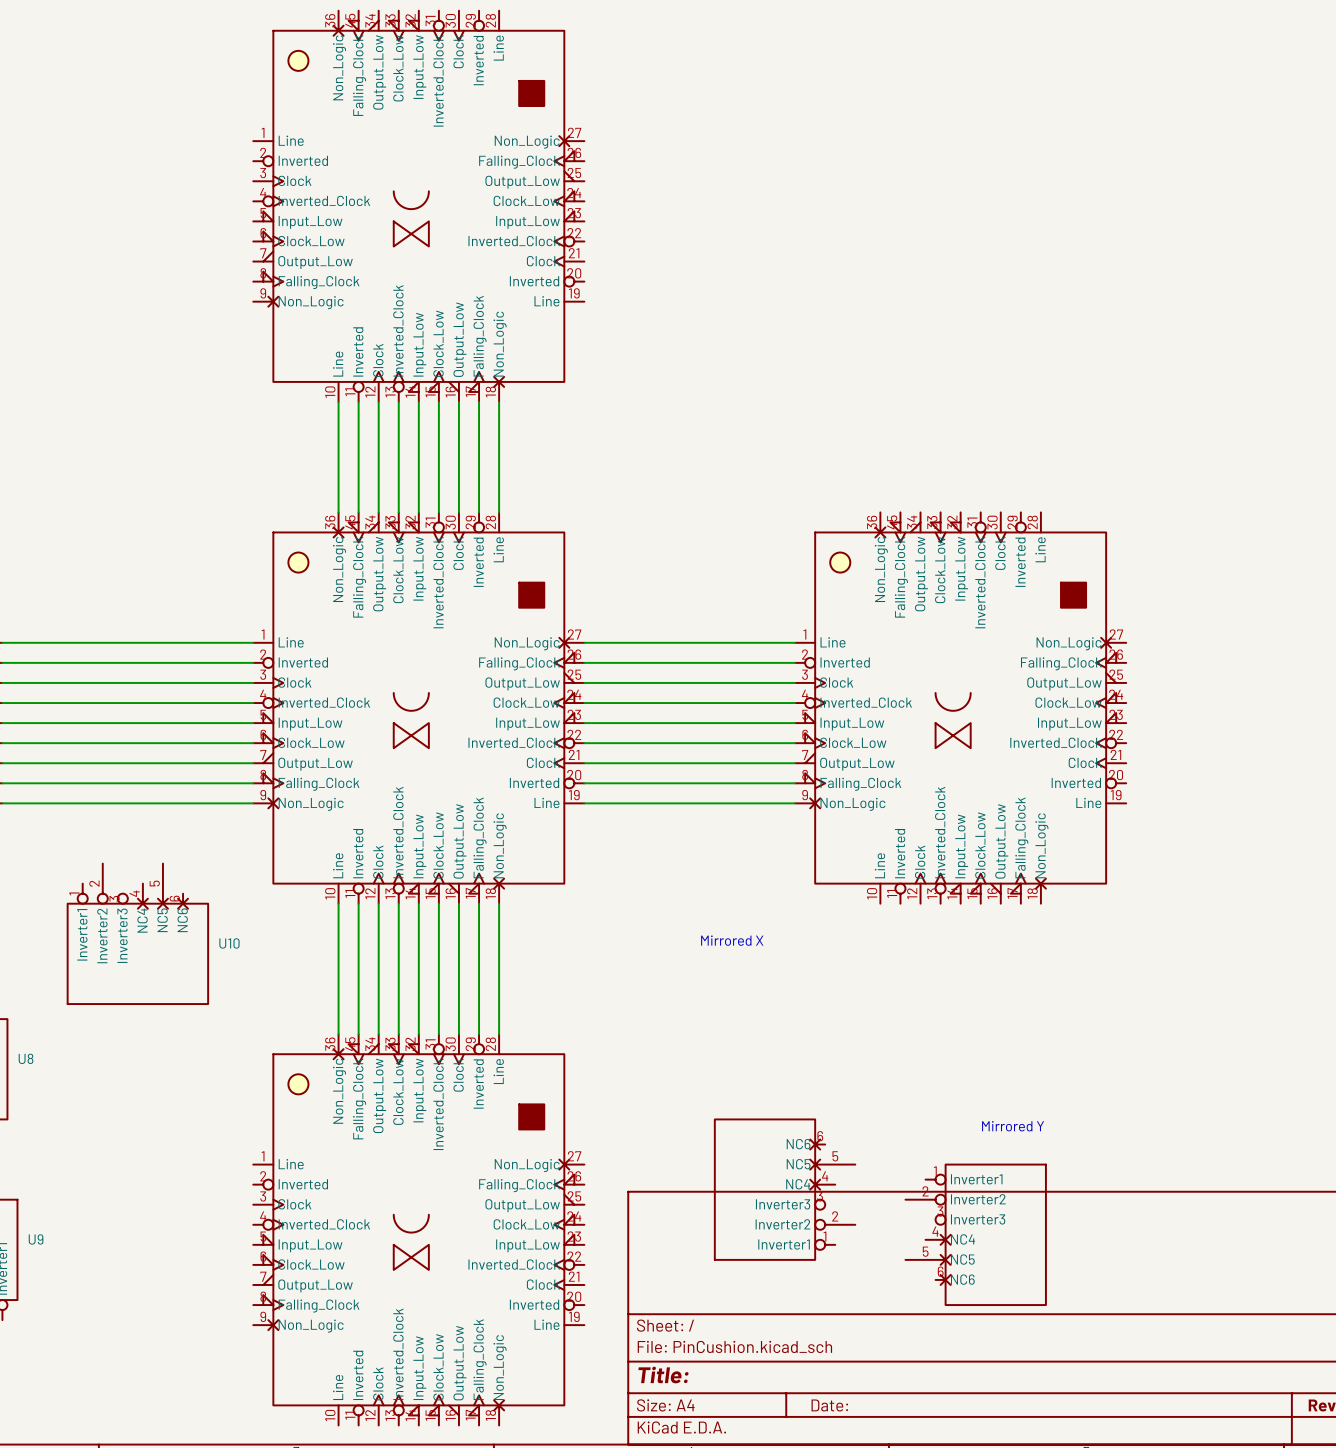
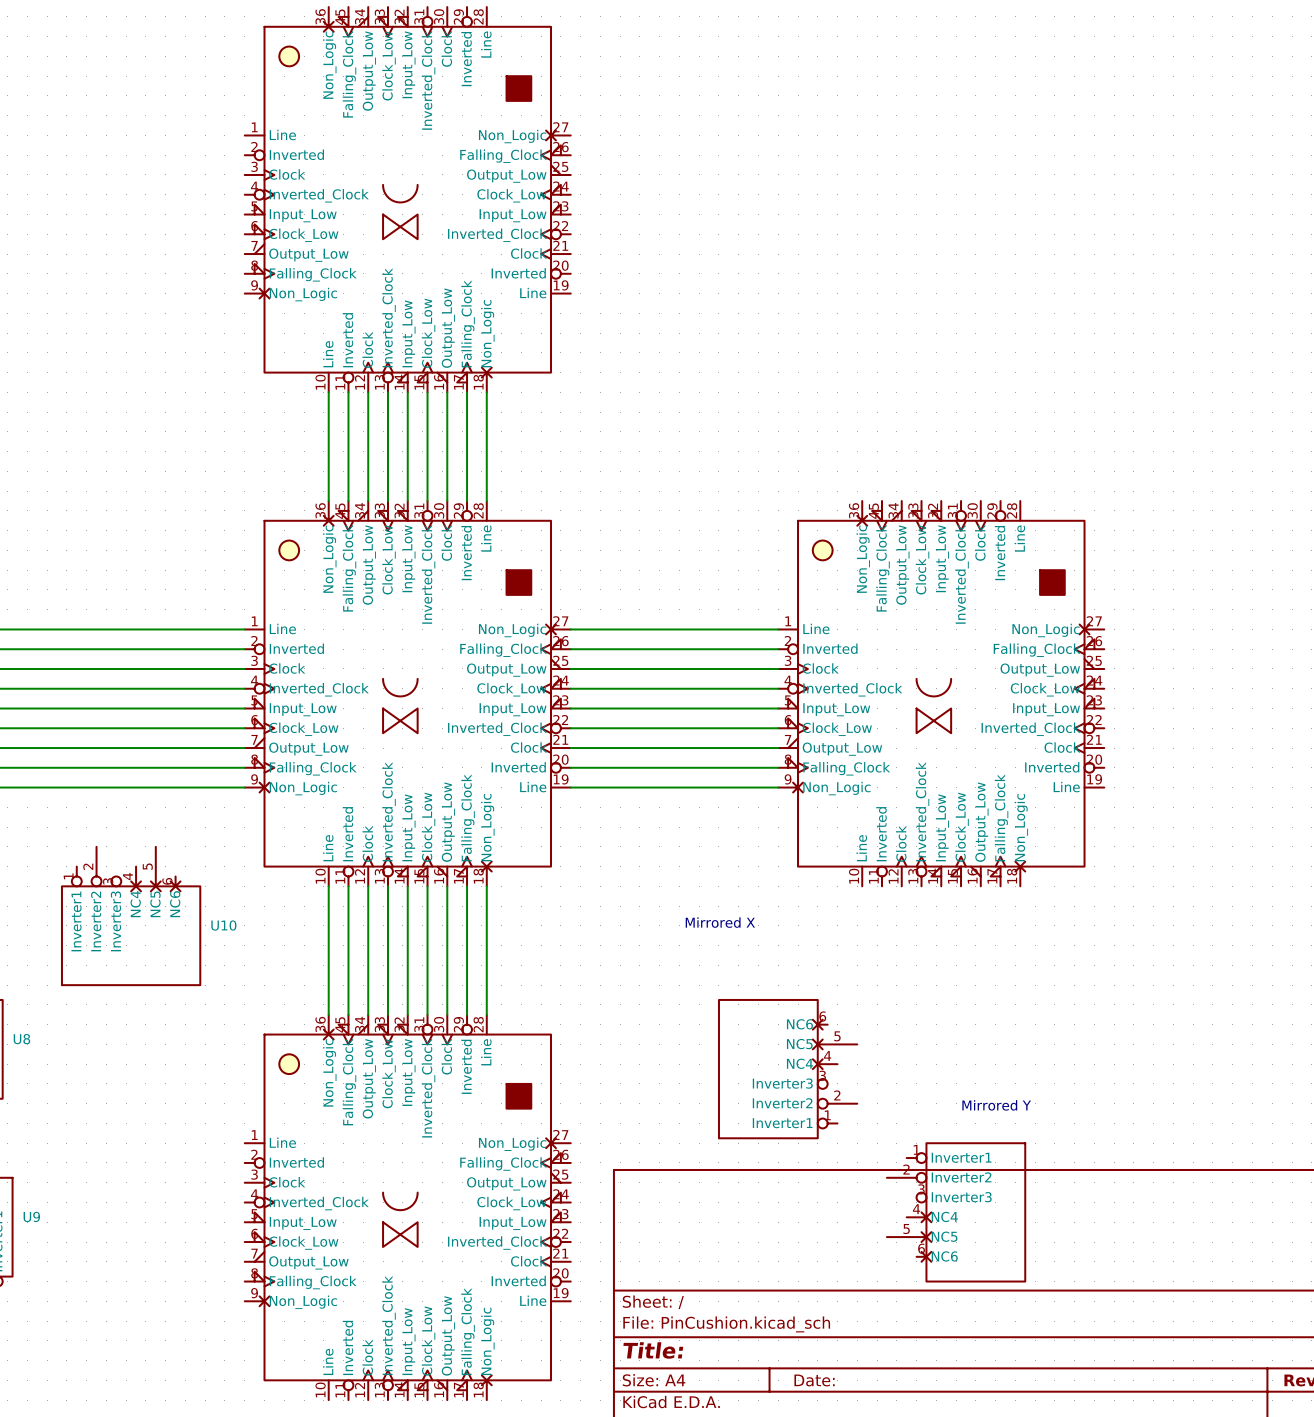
part position: (785, 1189) -> (788, 1069)

